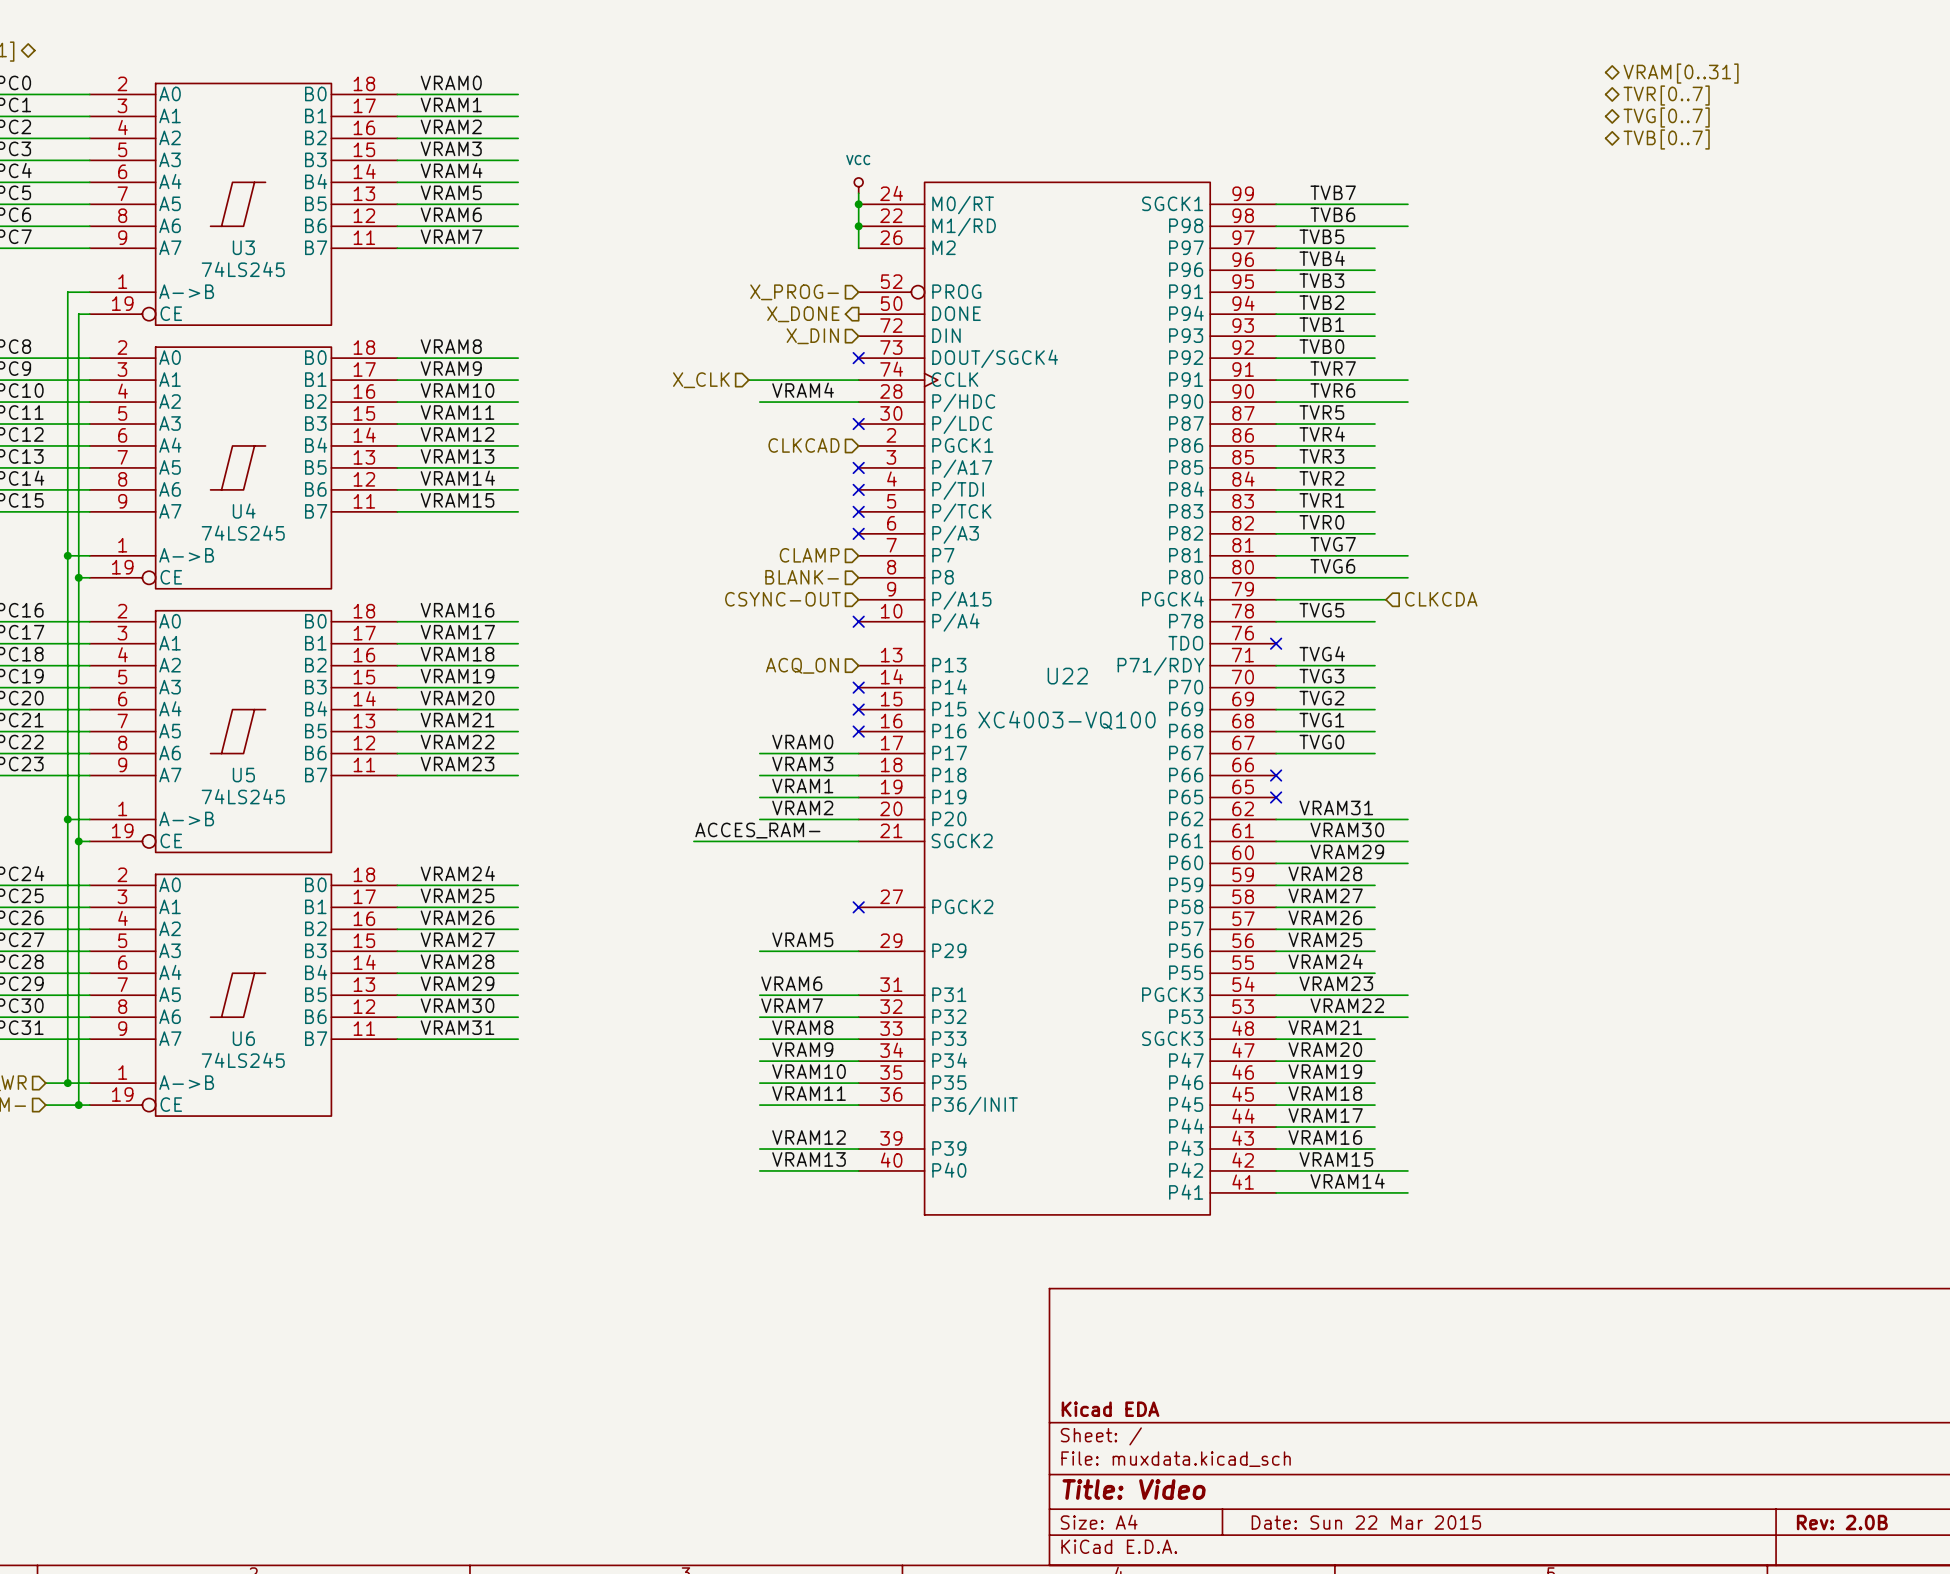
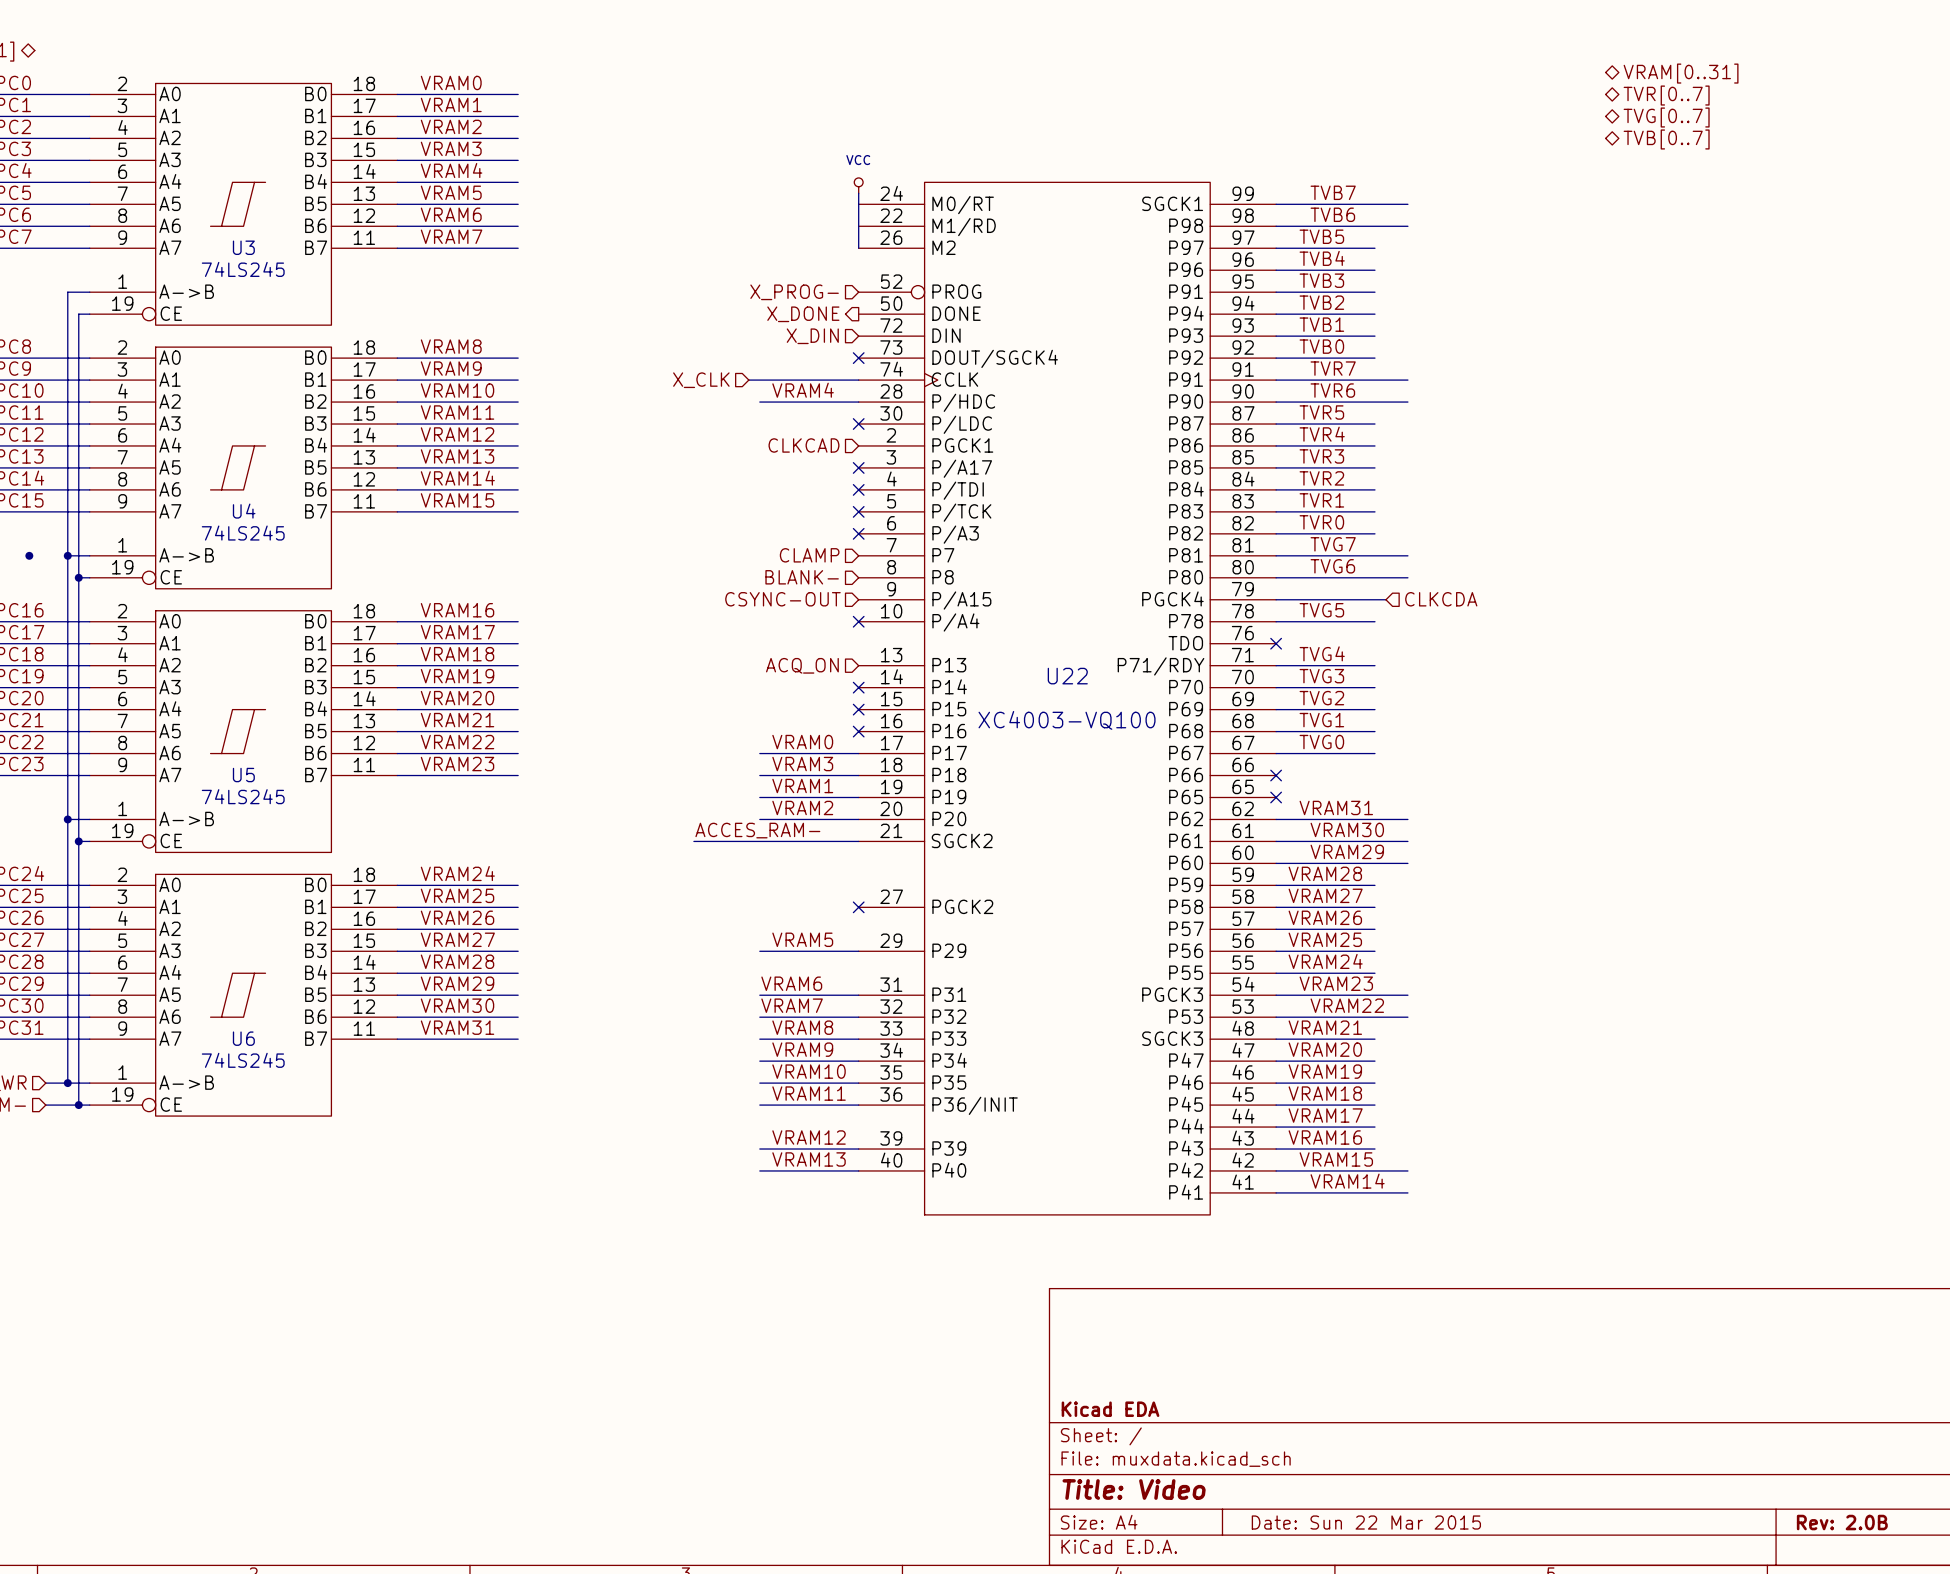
junction: (858, 204) -> none
junction: (858, 226) -> none
junction: none -> (29, 555)

